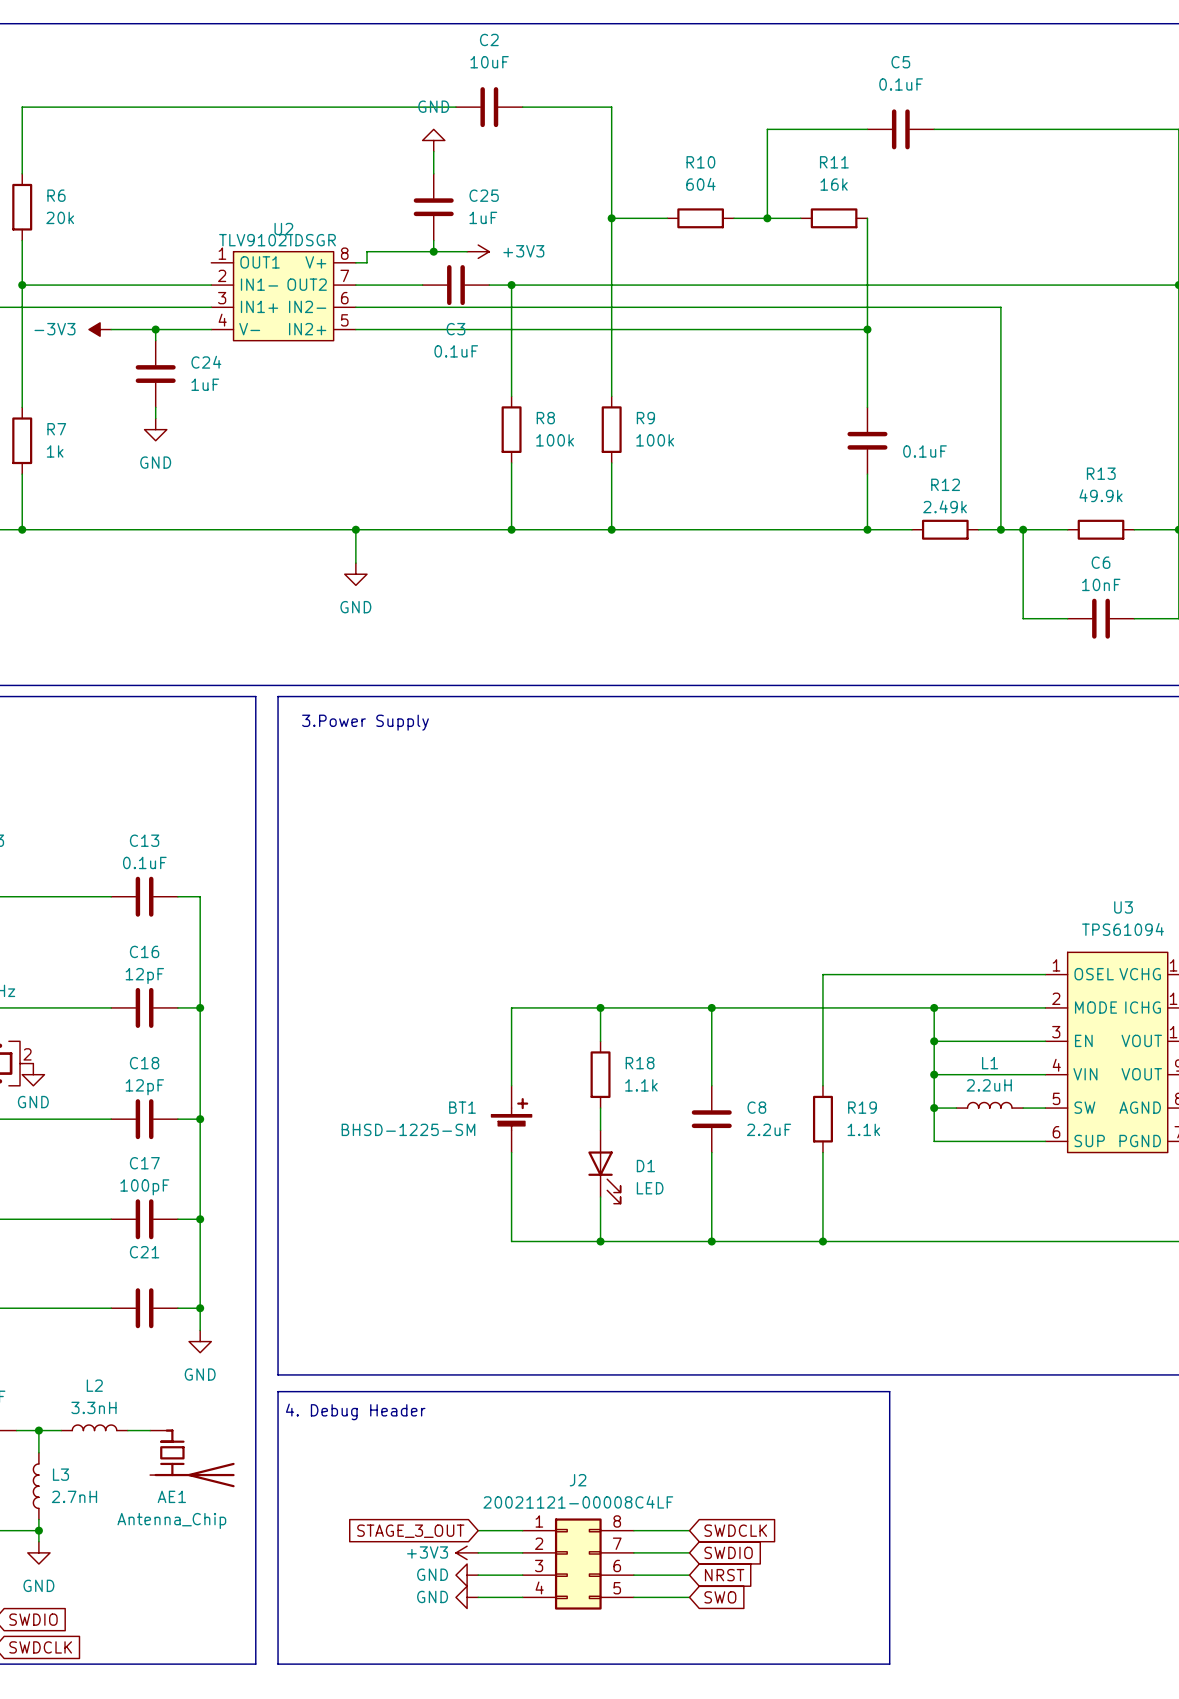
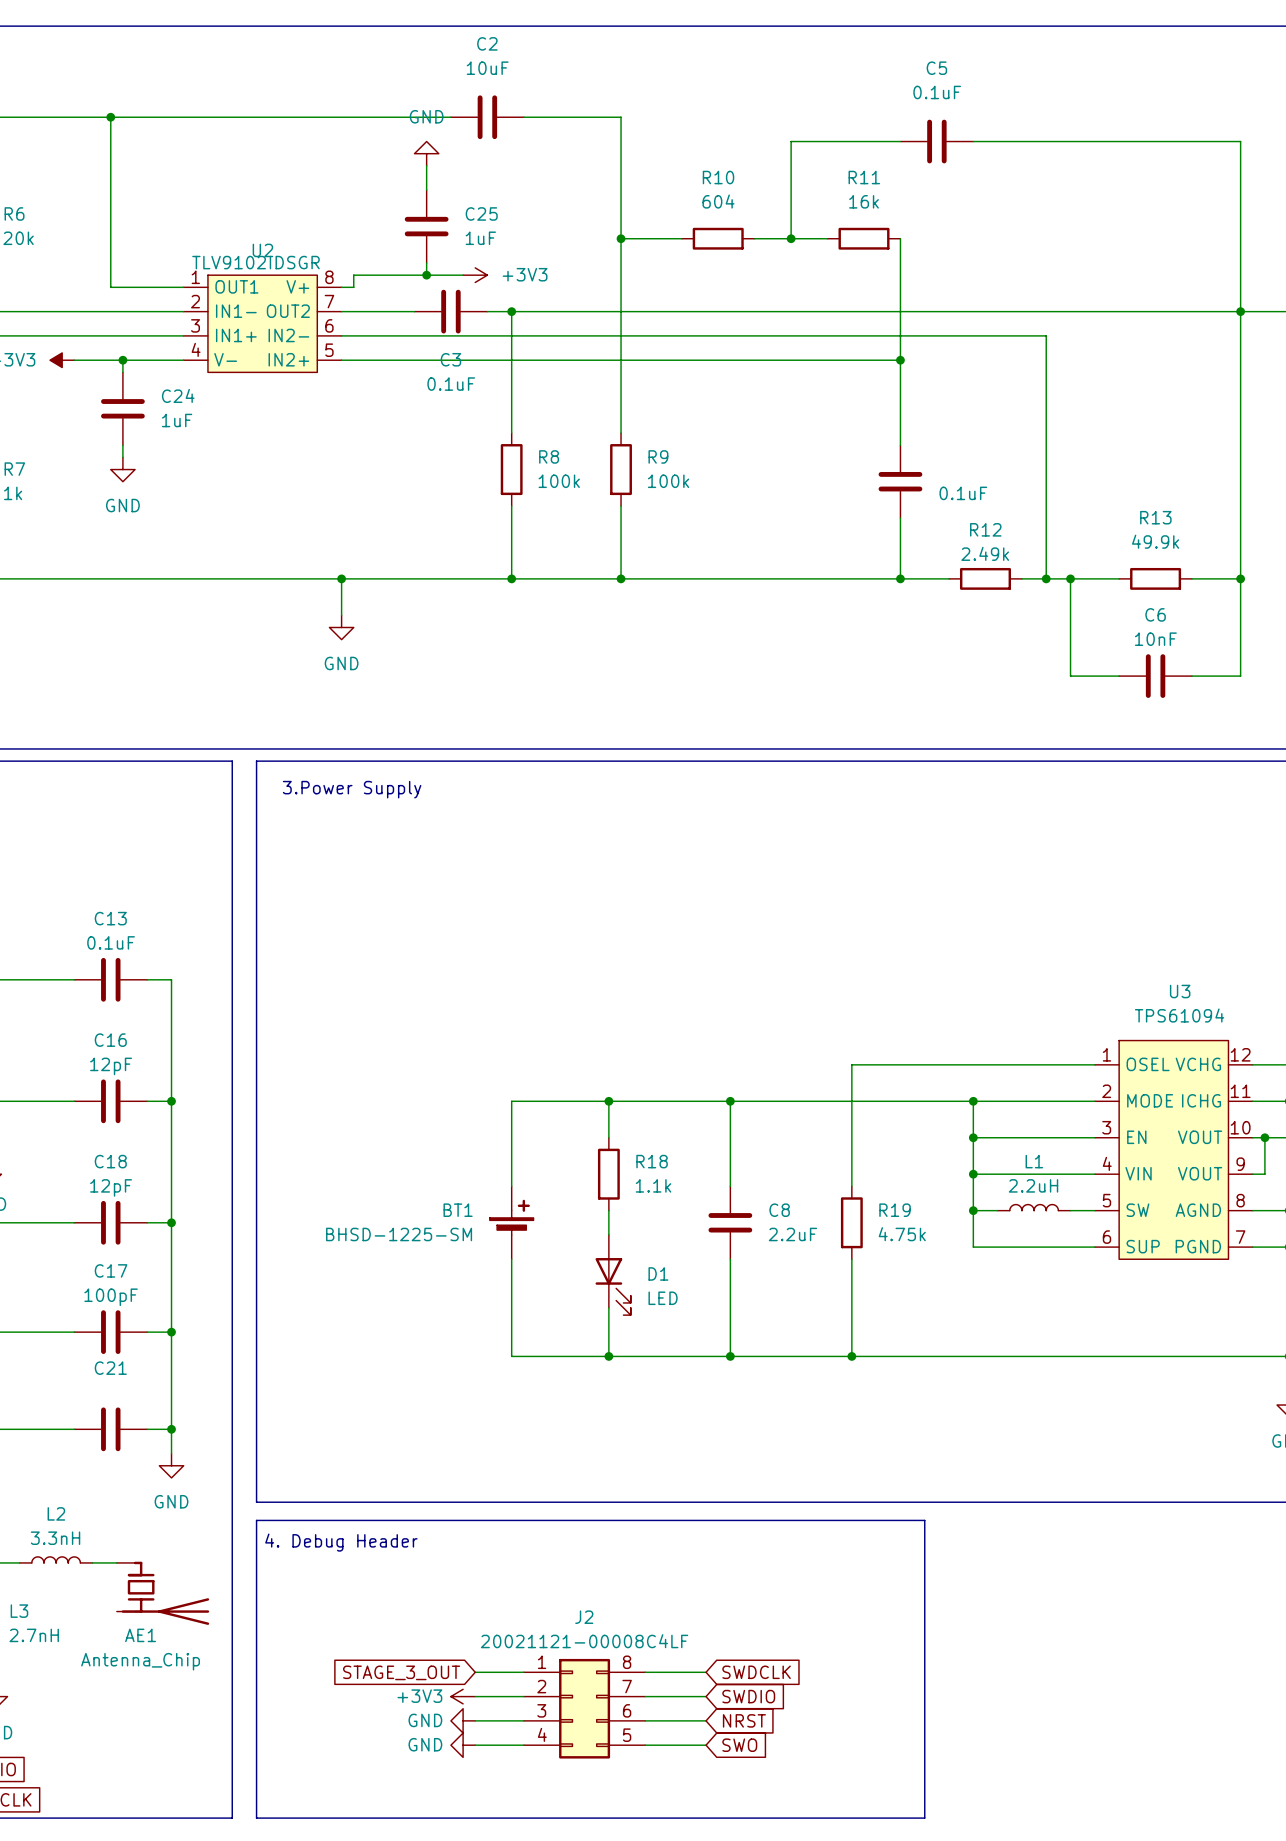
wire: none -> (110, 117) (110, 287) (183, 287)
junction: none -> (110, 117)
R19 value: 1.1k (863, 1129) -> 4.75k (902, 1234)

